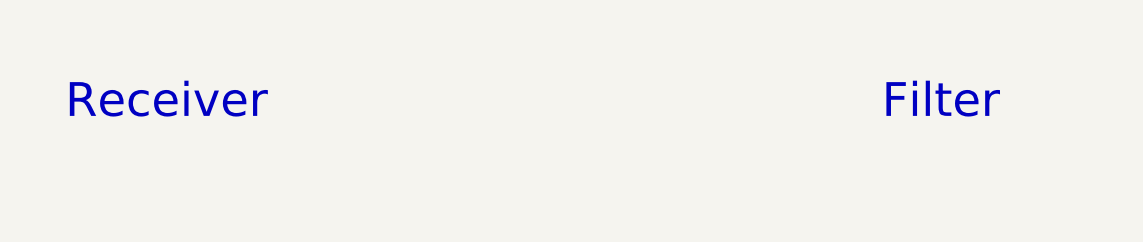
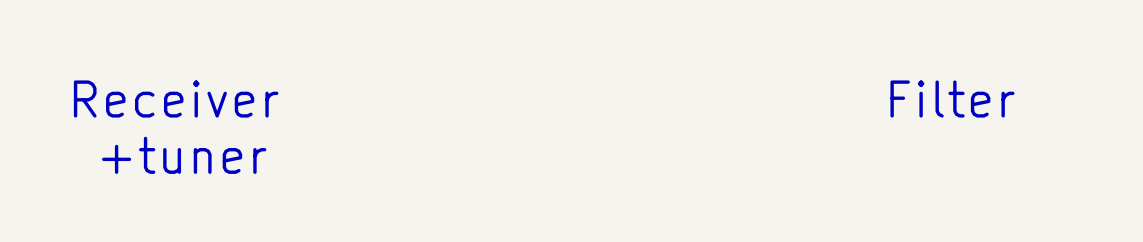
text: none -> +tuner (184, 155)

